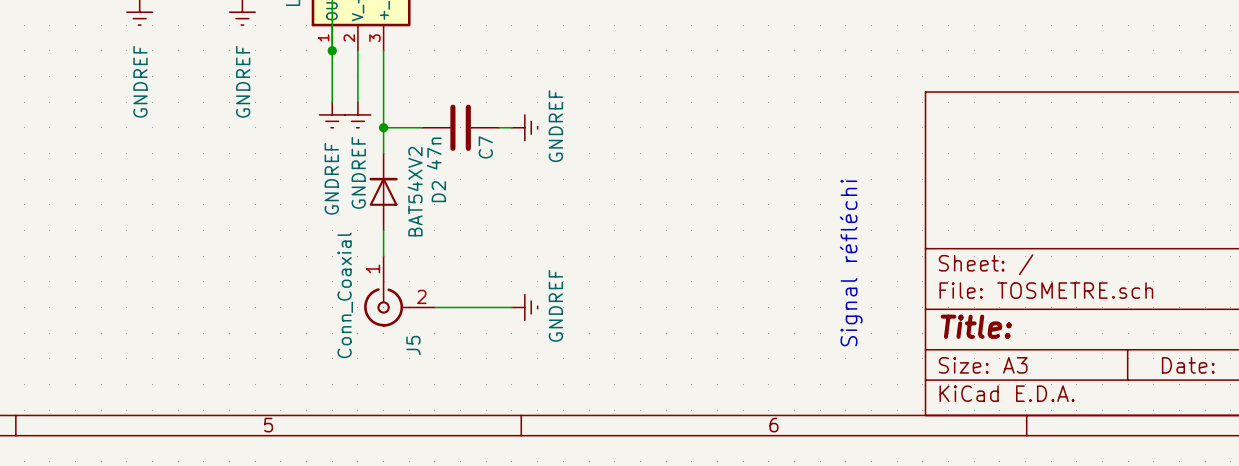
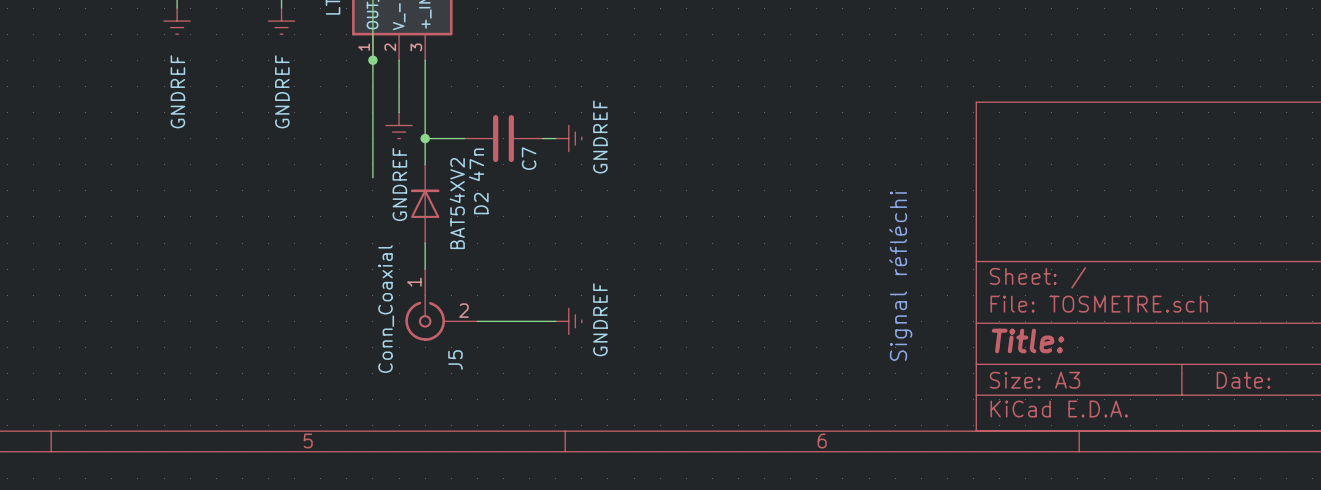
wire: none -> (372, 112) (372, 177)
power symbol: GNDREF (332, 114) -> none

